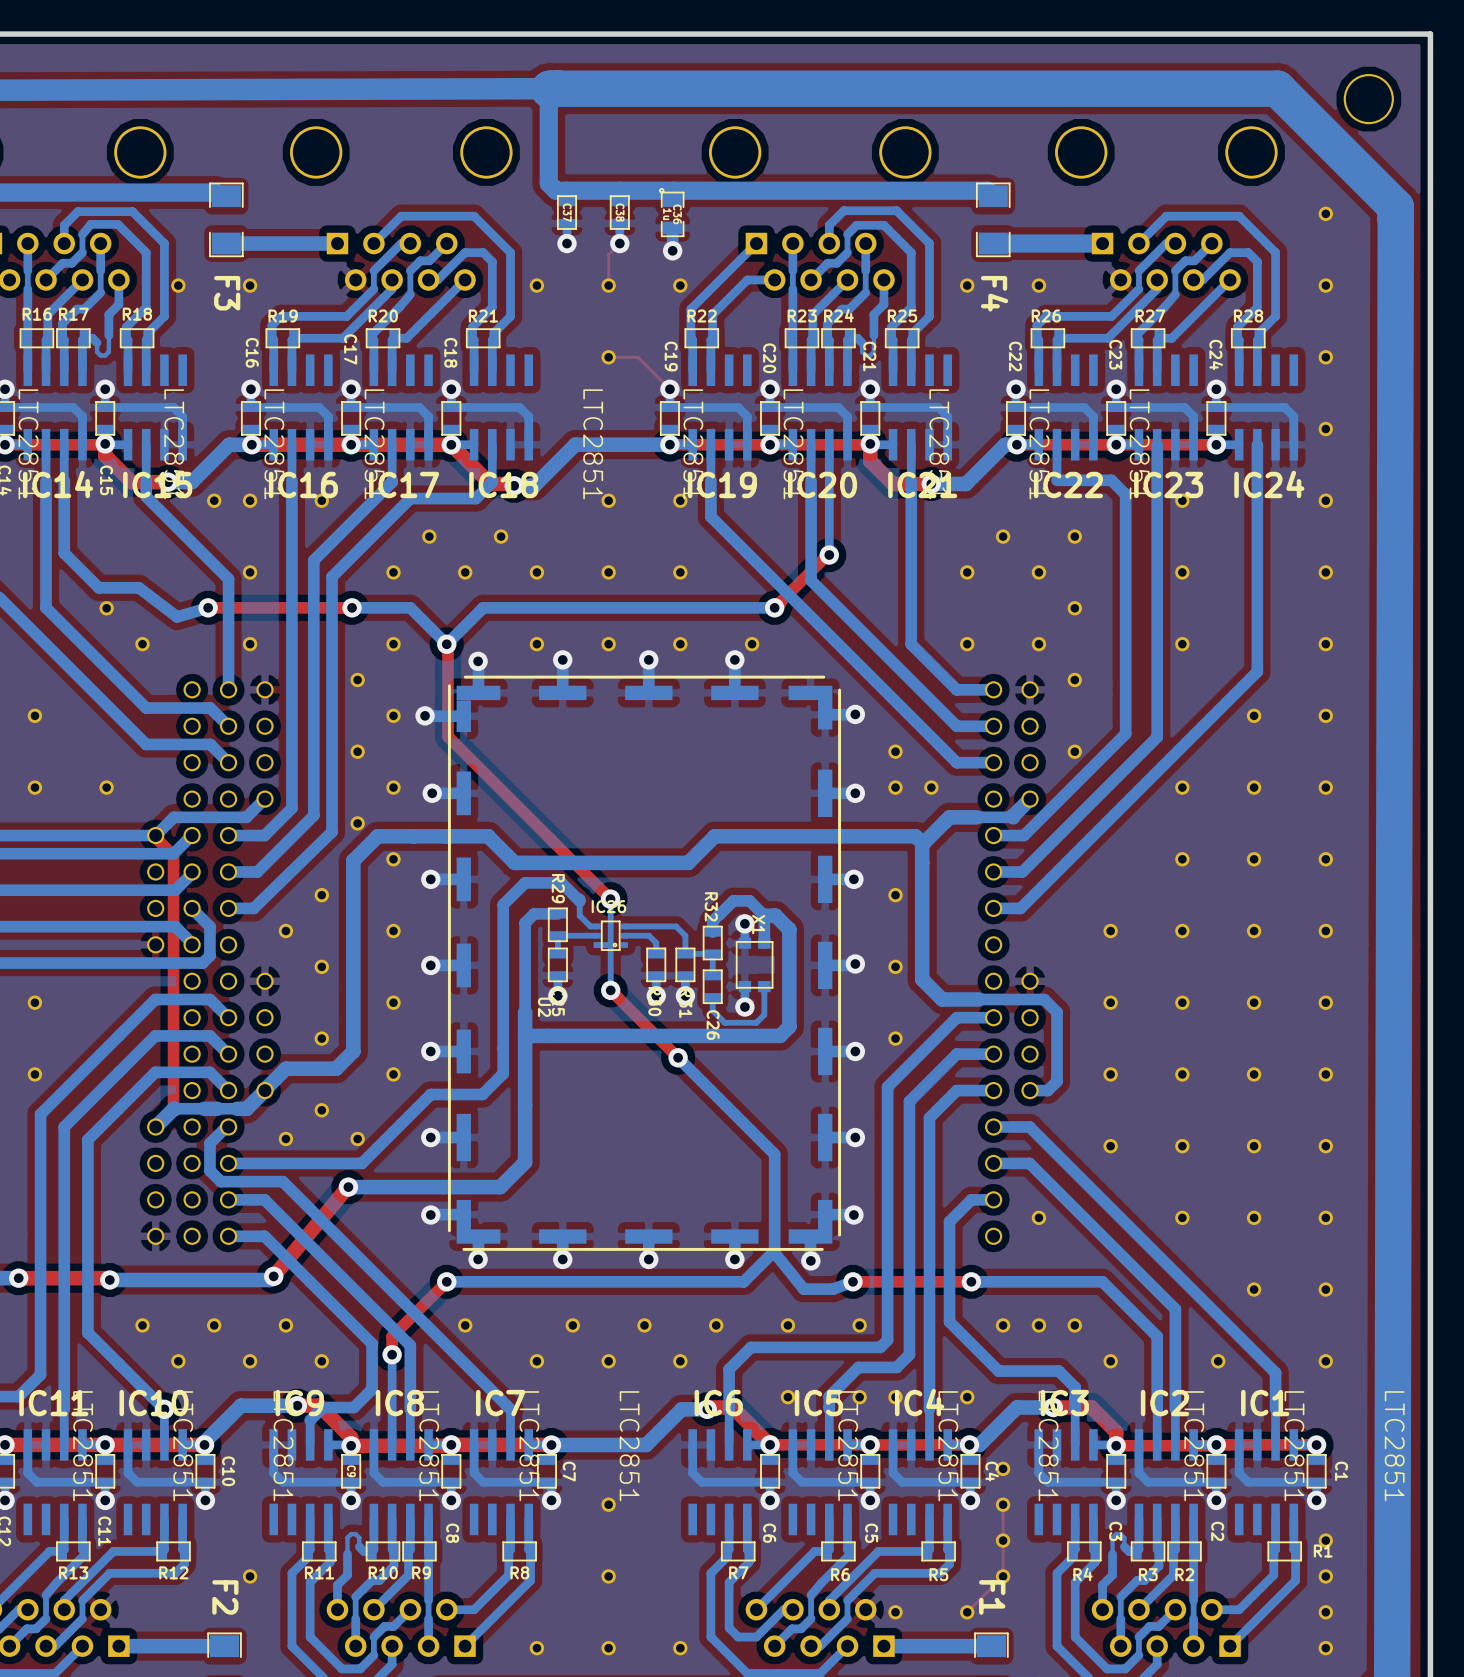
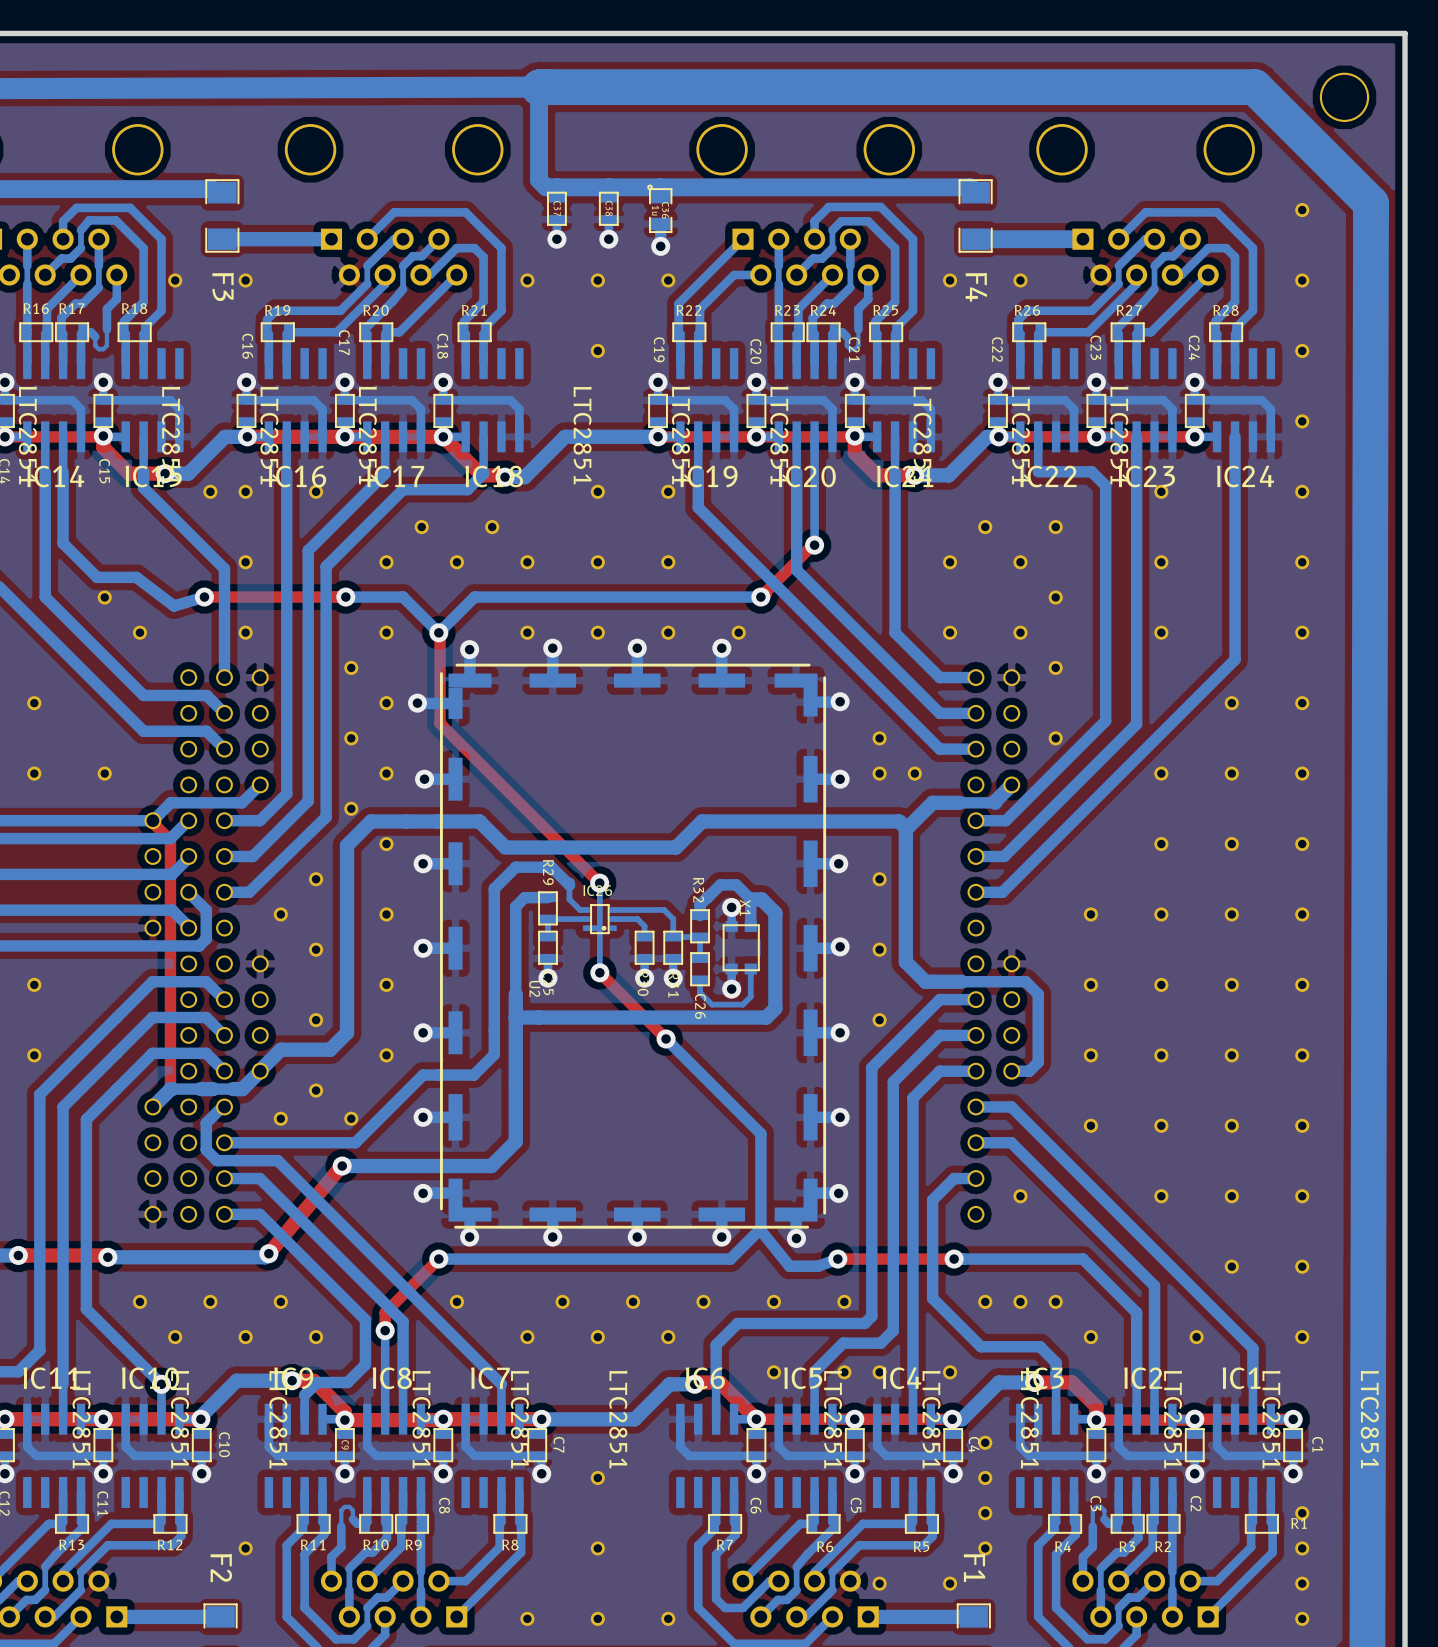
top track: (619, 243) (608, 254) (608, 285) -> none
top track: (608, 357) (637, 357) (669, 389) -> none
top track: (1003, 1504) (1003, 1576) (967, 1612) -> none

